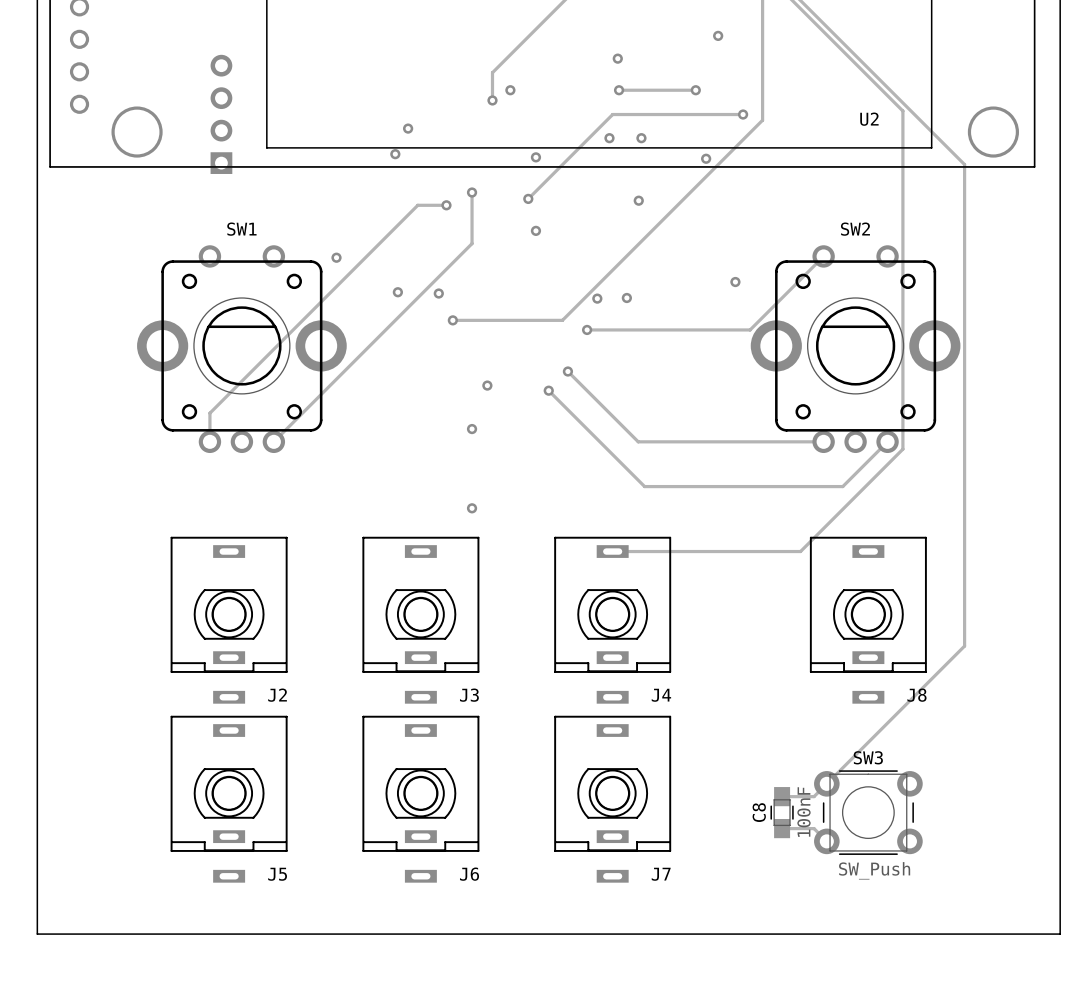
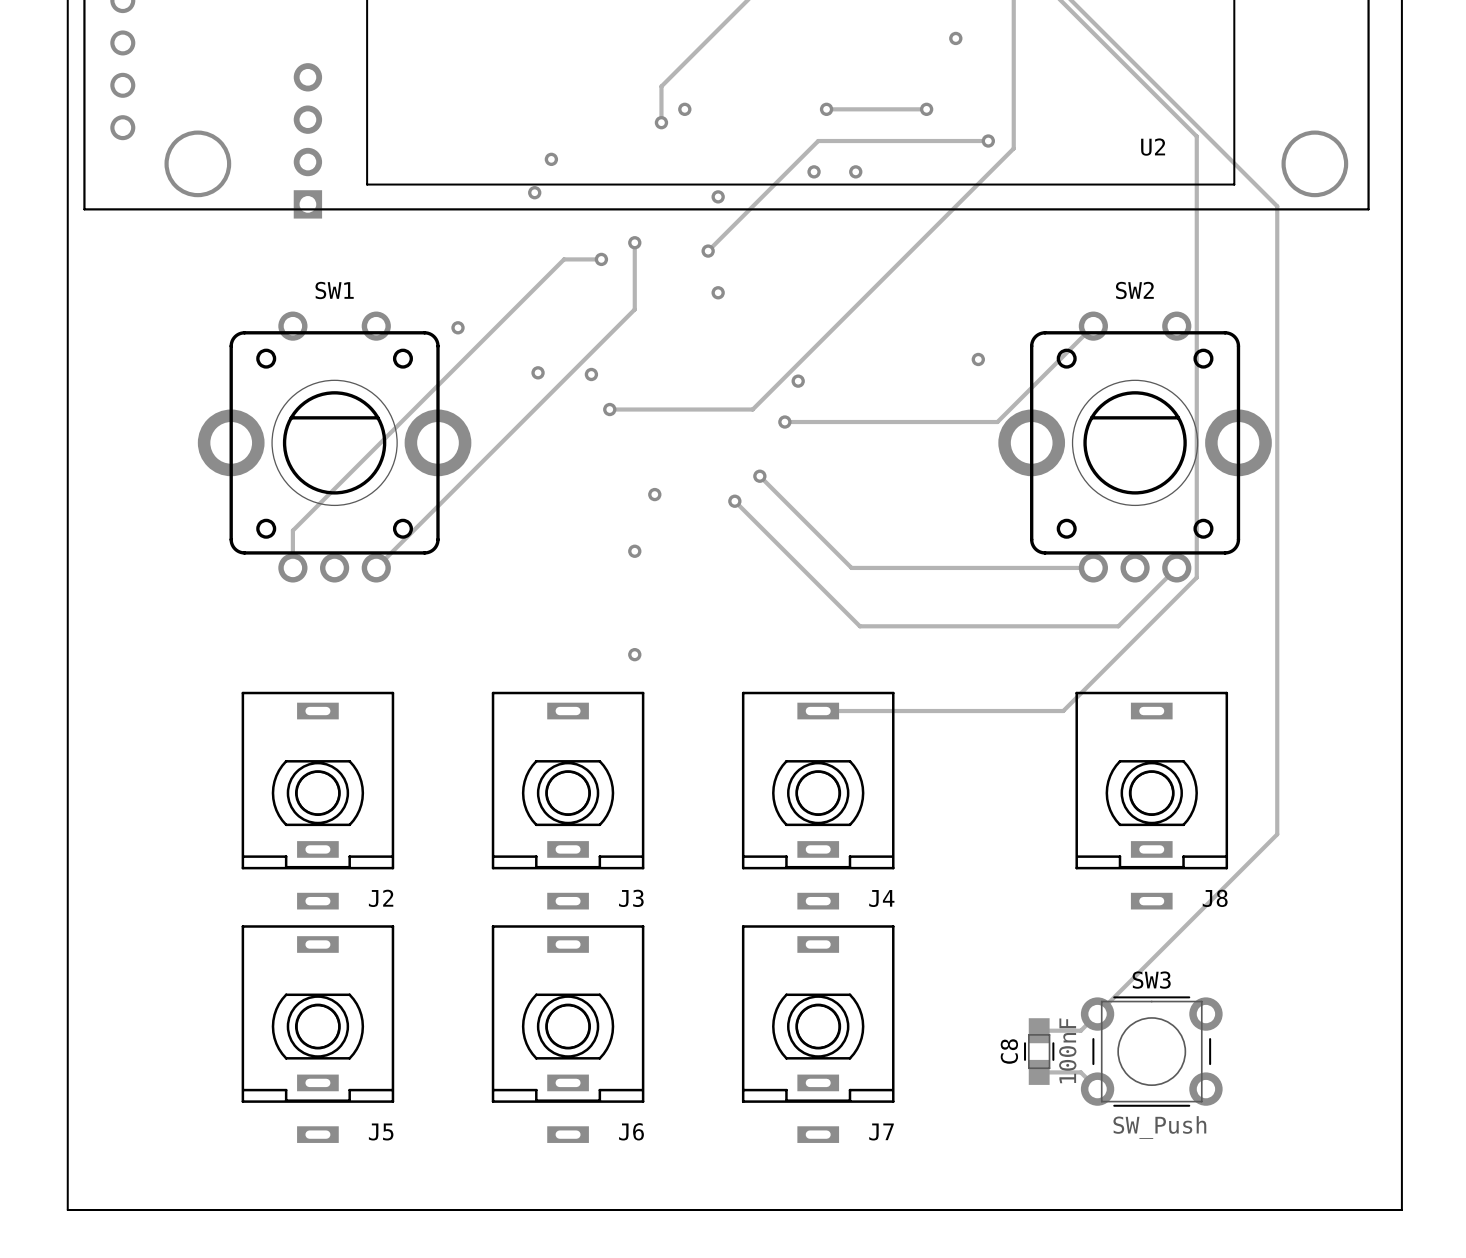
via: (617, 58) -> none
via: (706, 158) -> none
via: (638, 200) -> none
via: (626, 297) -> none

